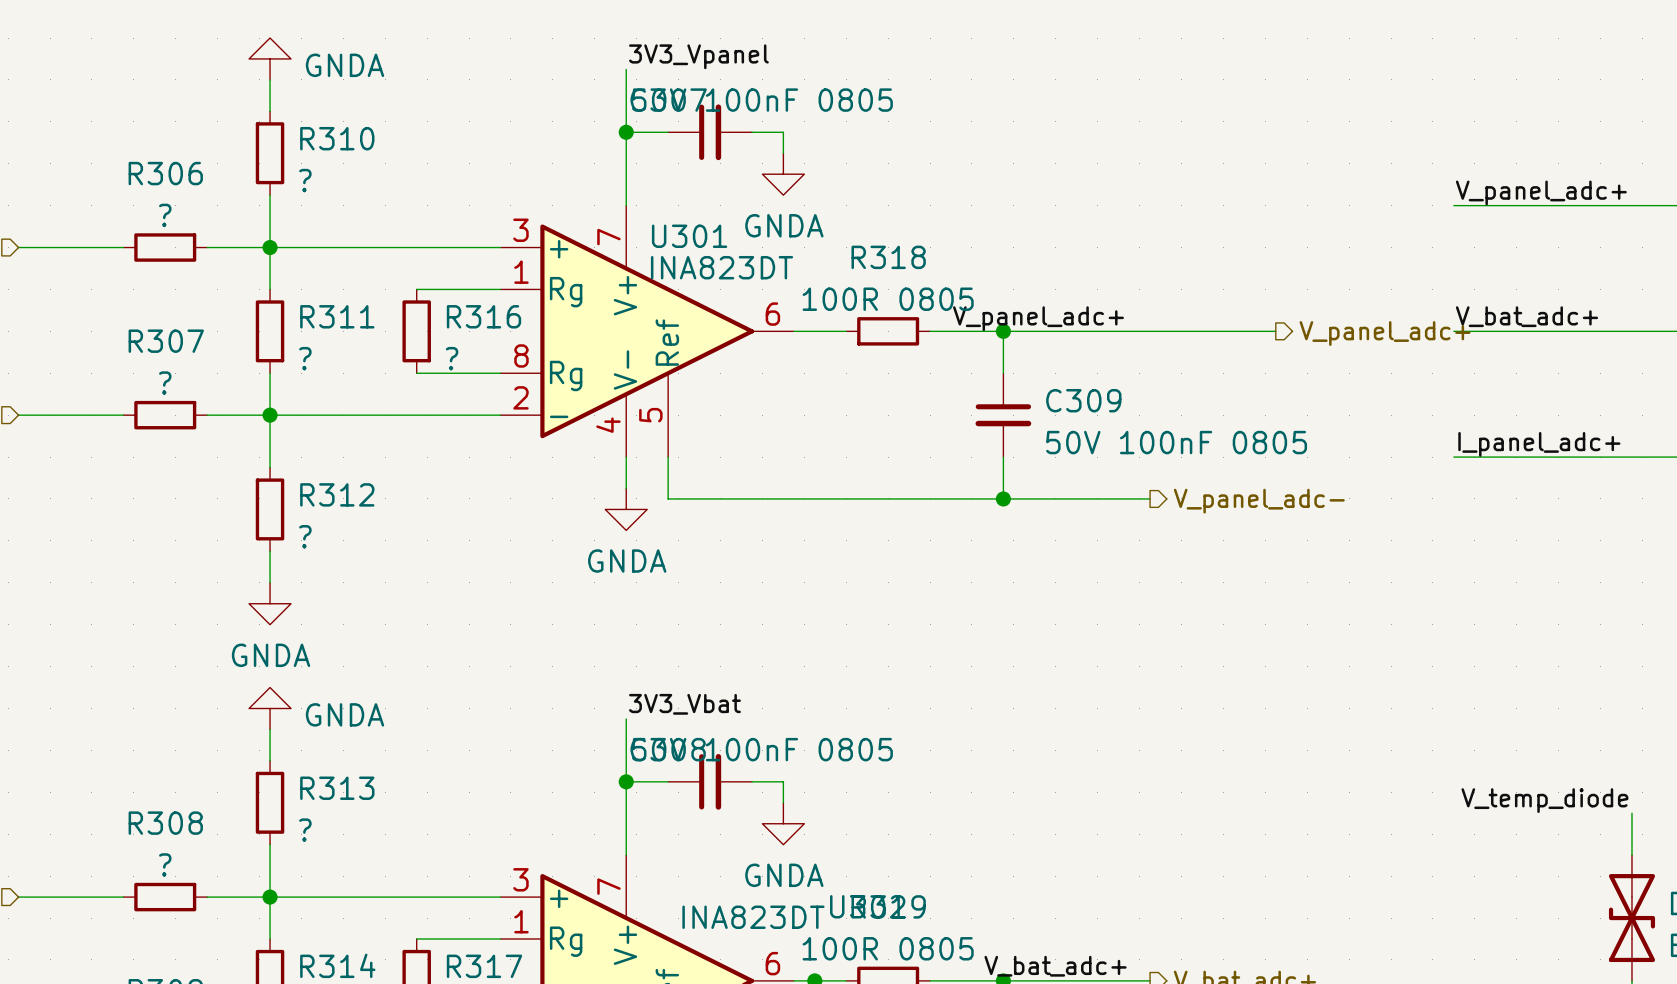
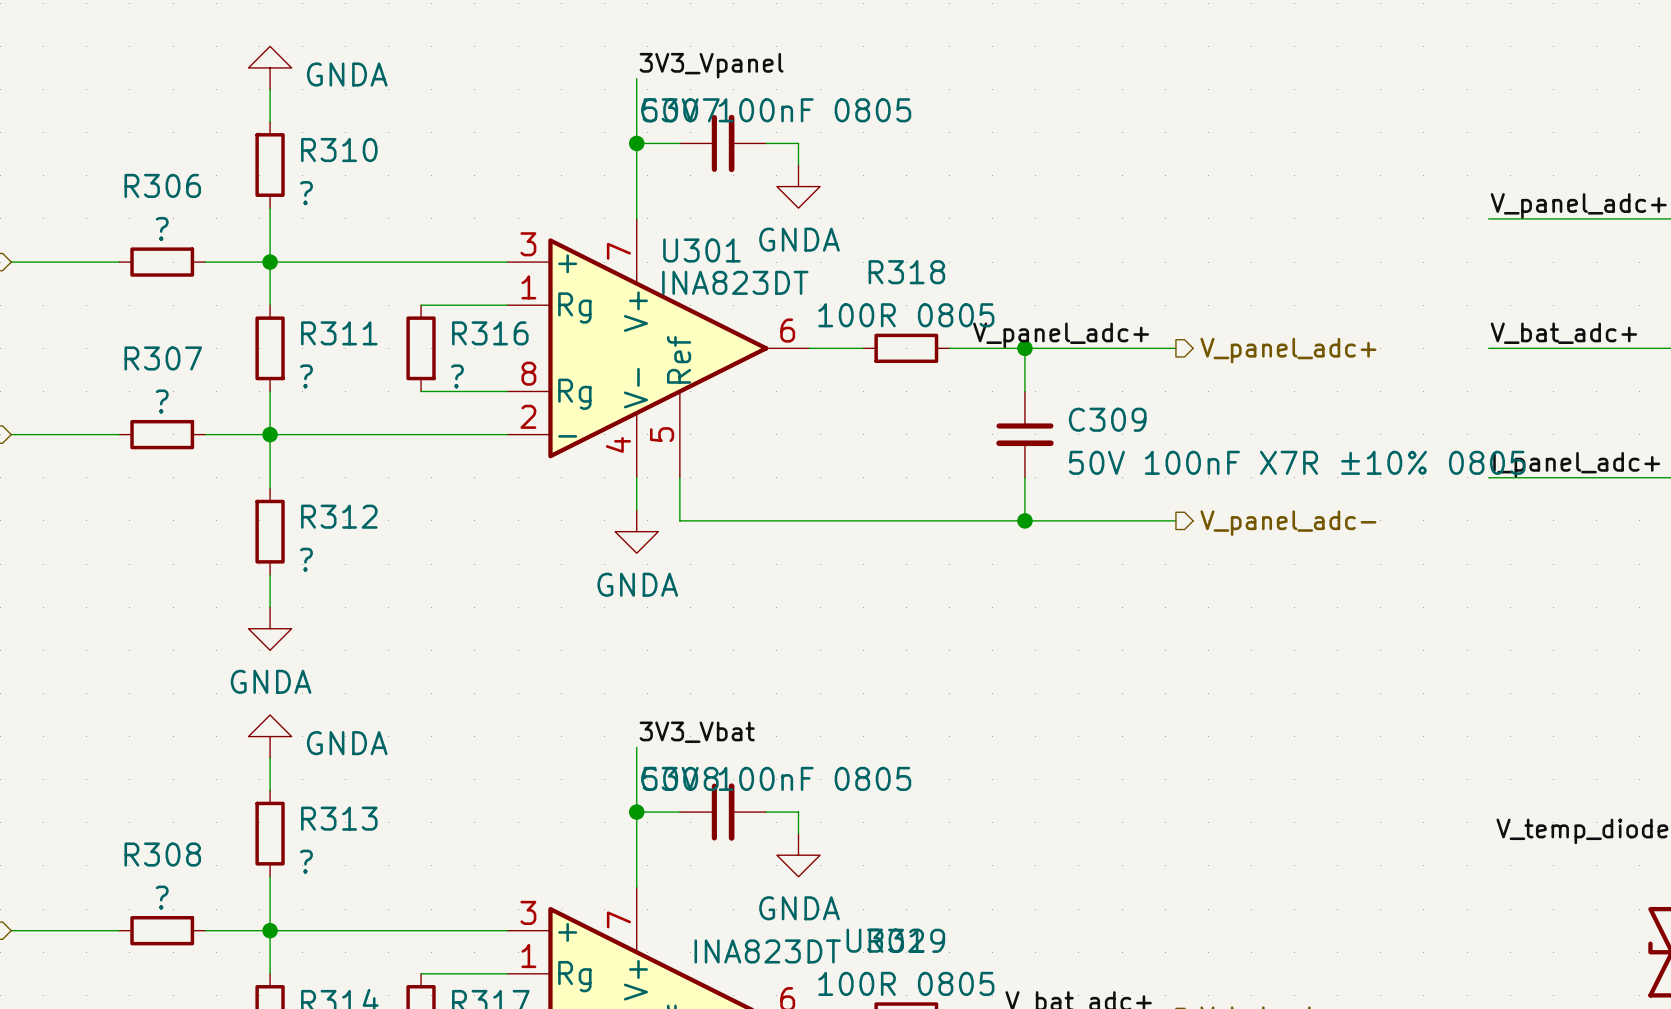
wire: (1150, 331) (1275, 331) -> none
hierarchical label position: V_panel_adc+ (1385, 333) -> V_panel_adc+ (1288, 350)
C309 value: 50V 100nF 0805 (1176, 442) -> 50V 100nF X7R ±10% 0805 (1297, 462)

